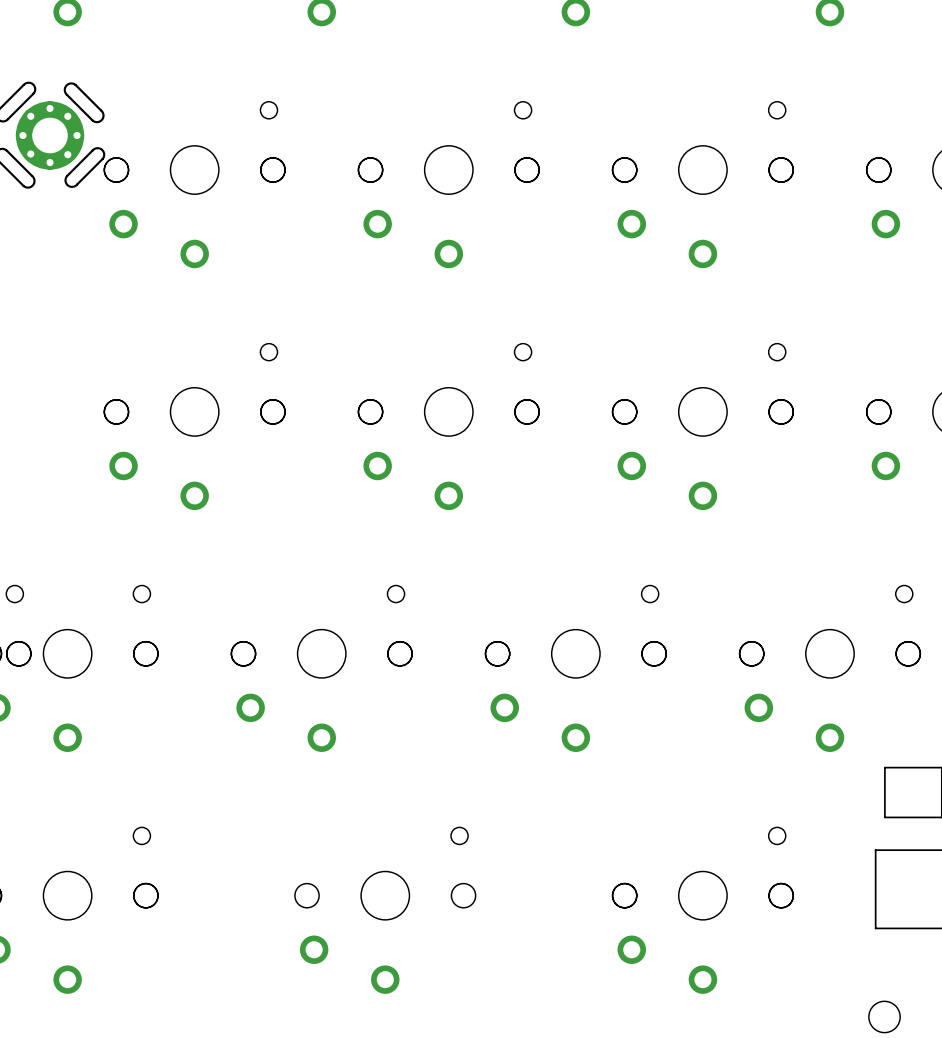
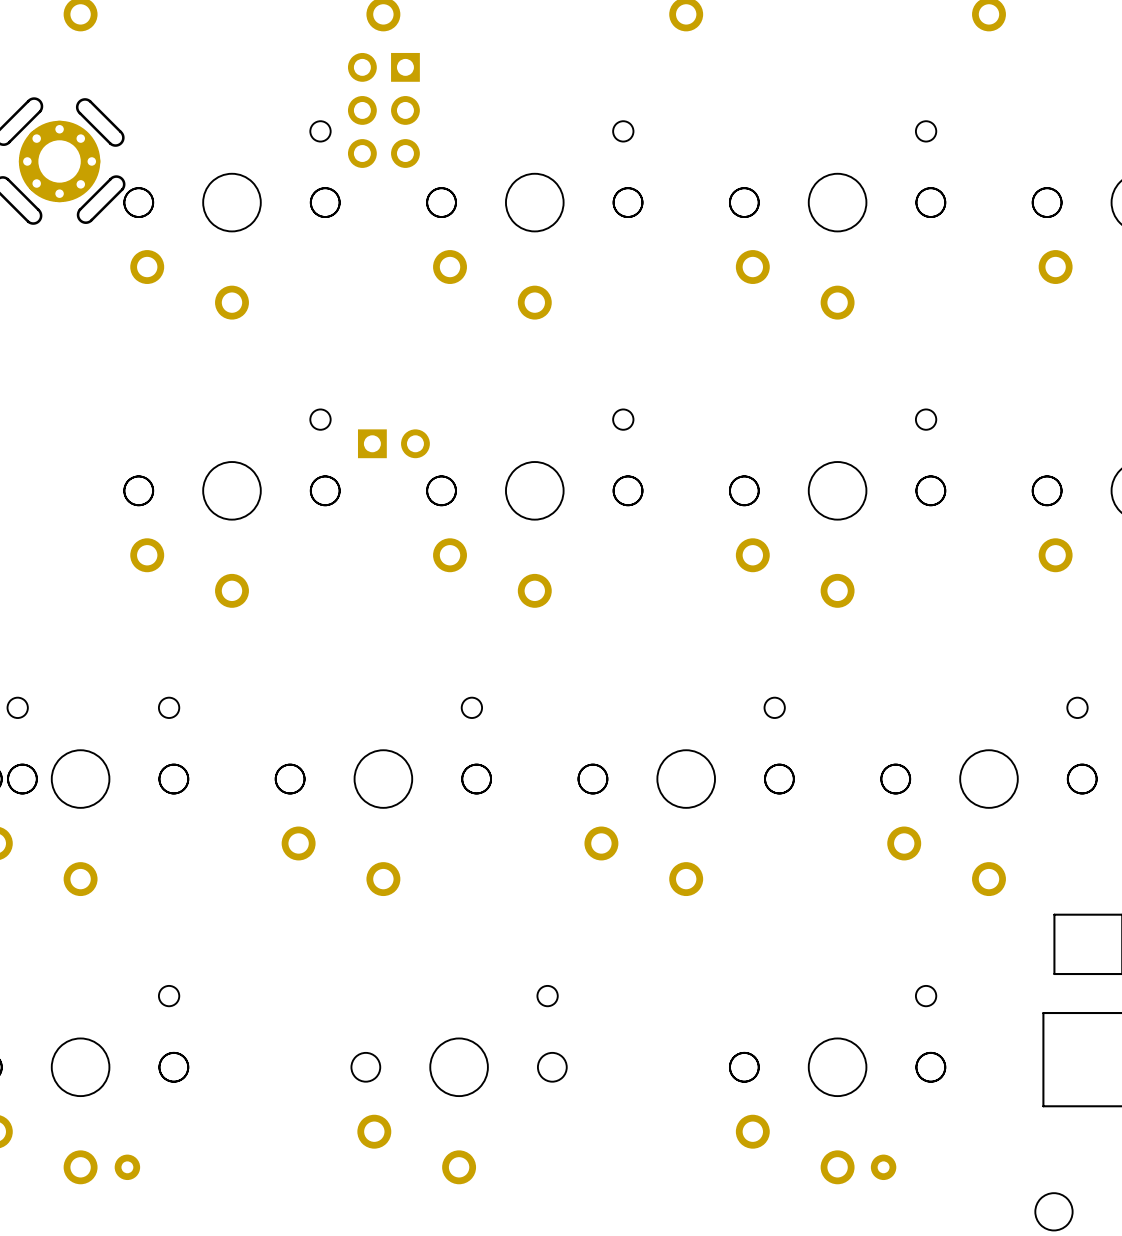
part: none -> (383, 110)
part: none -> (393, 443)
part: none -> (127, 1167)
part: none -> (883, 1167)

